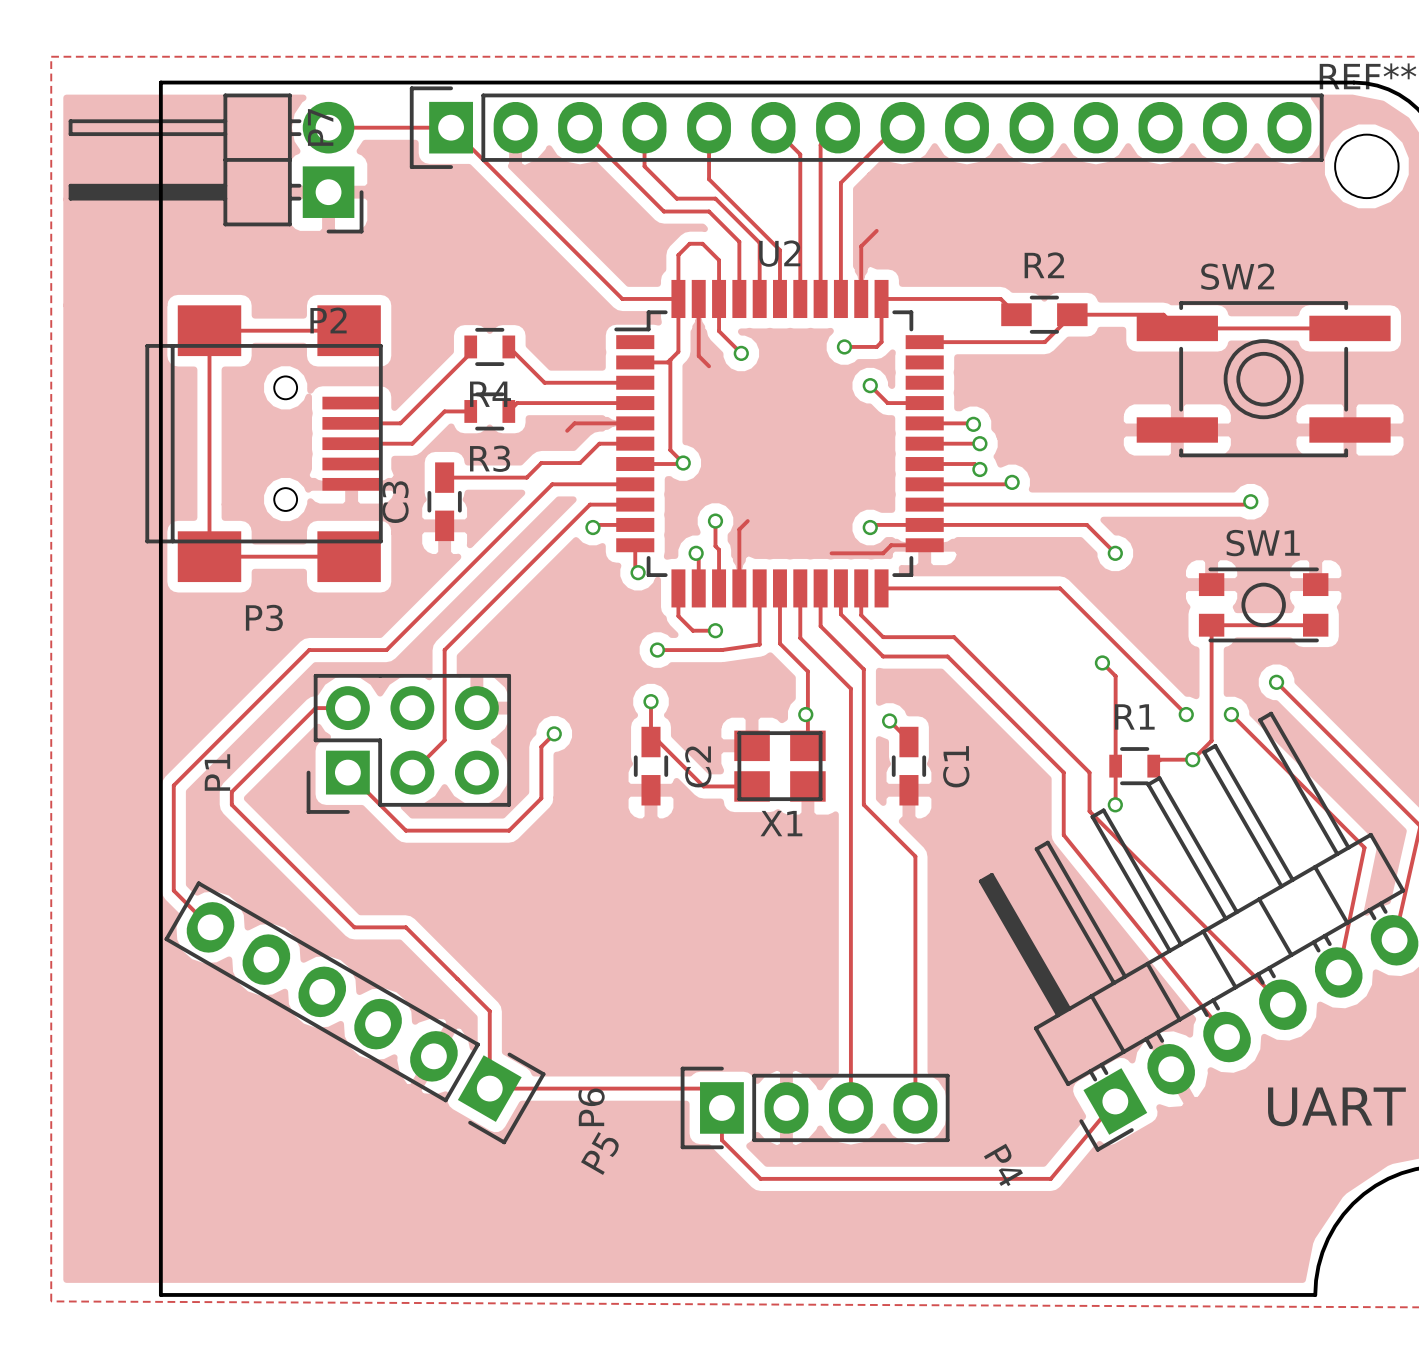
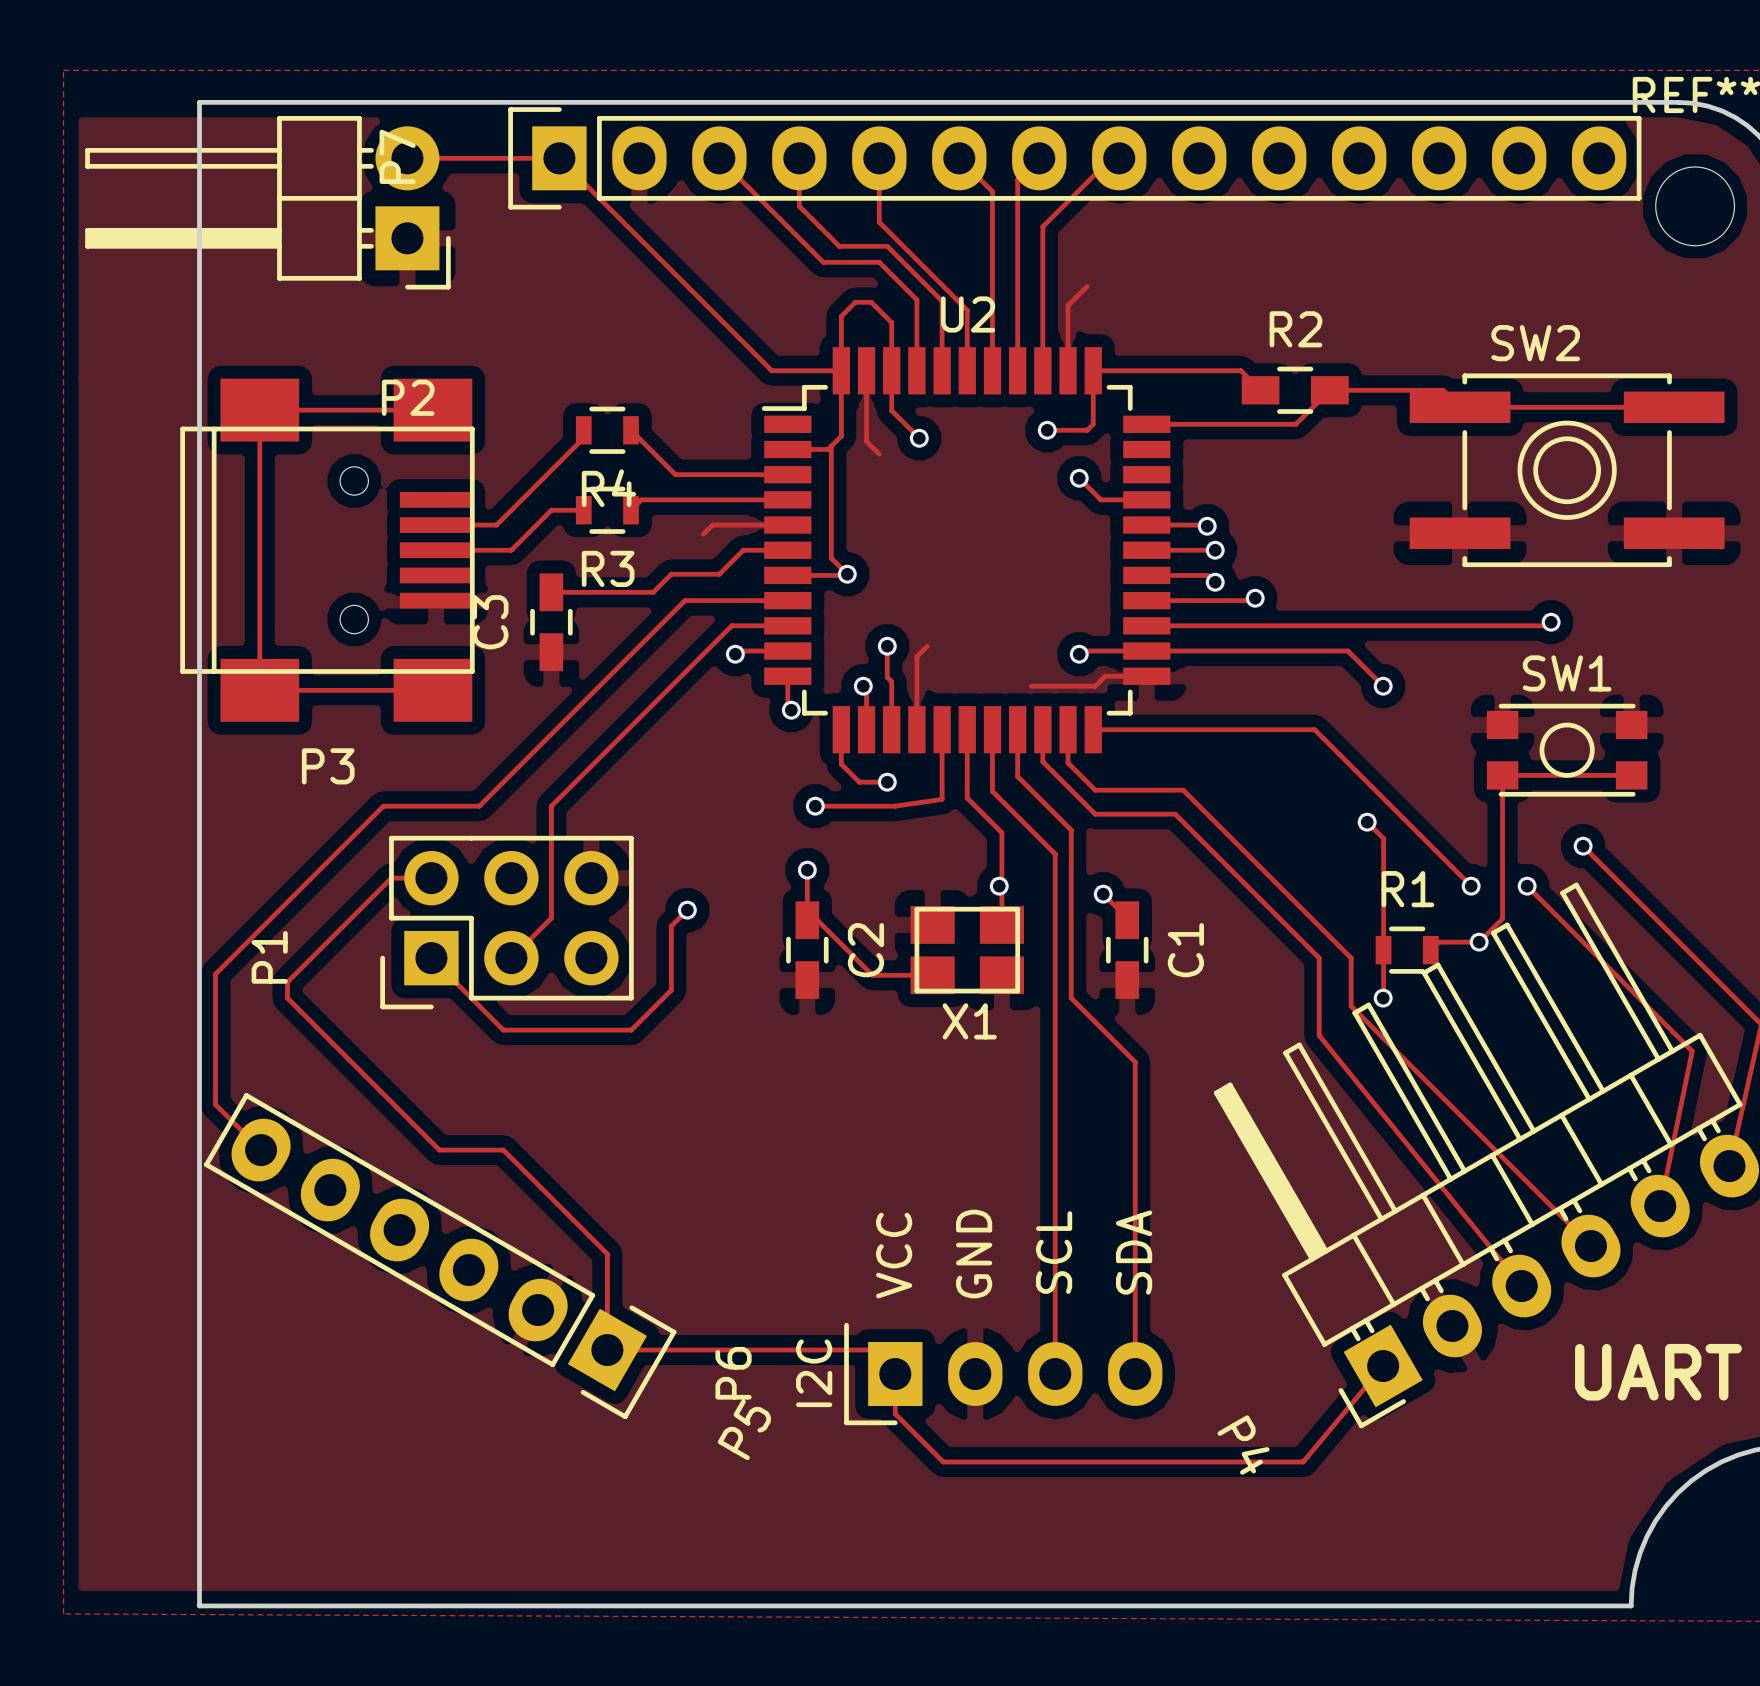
P6 footprint: [680, 1066, 950, 1150] -> [844, 1322, 1163, 1426]

